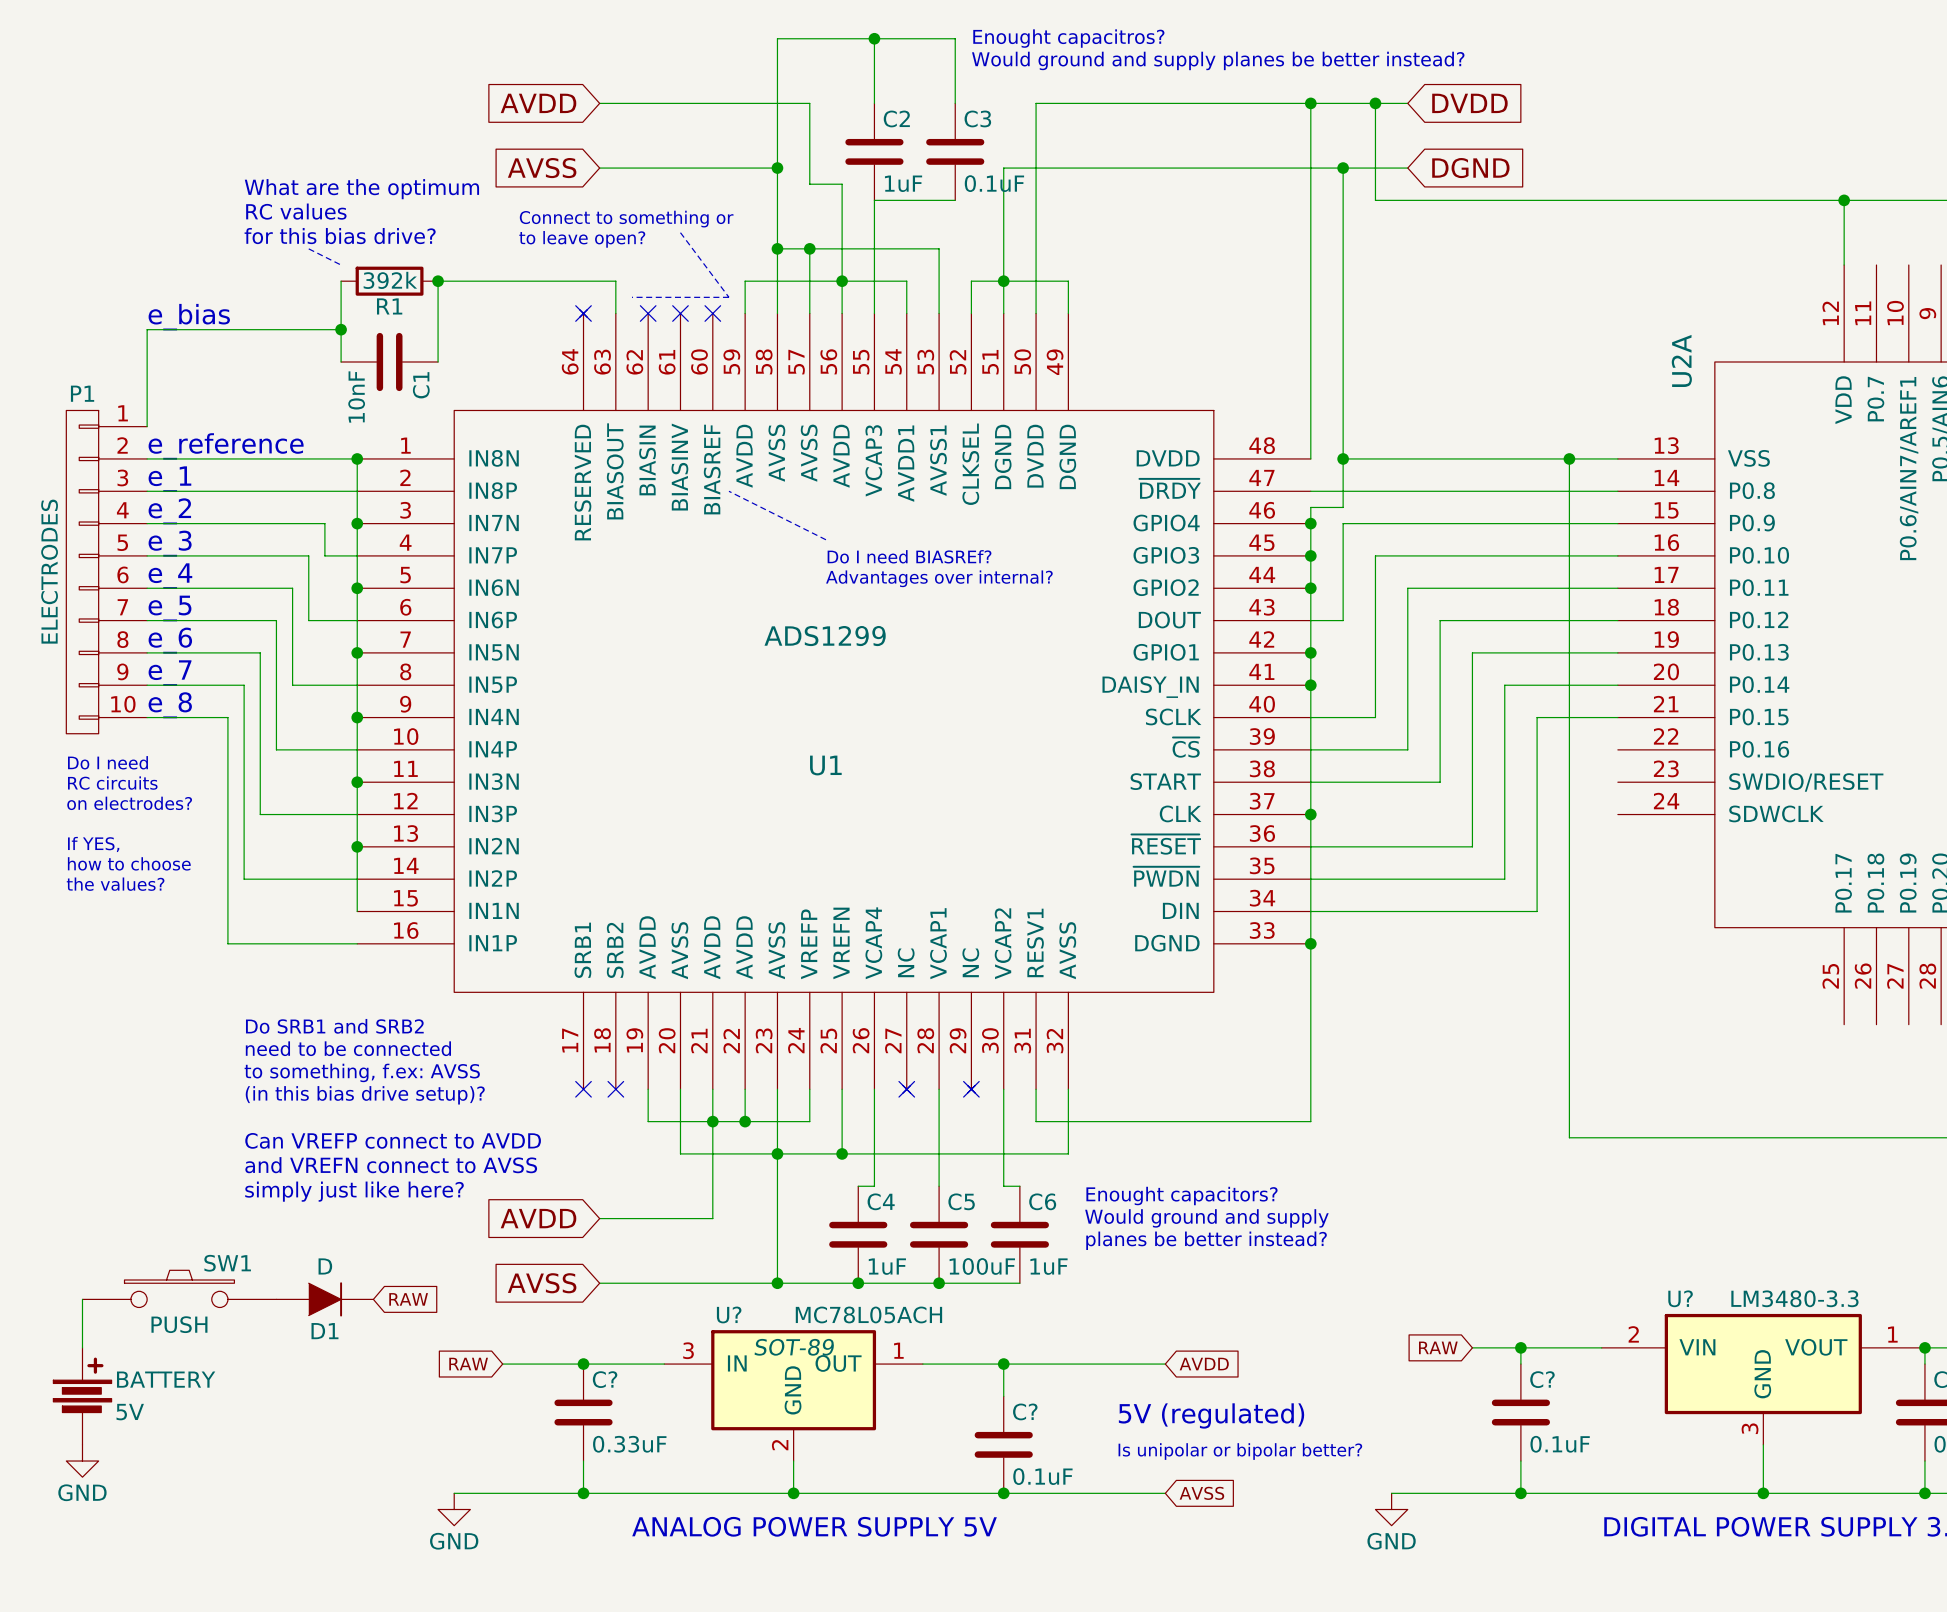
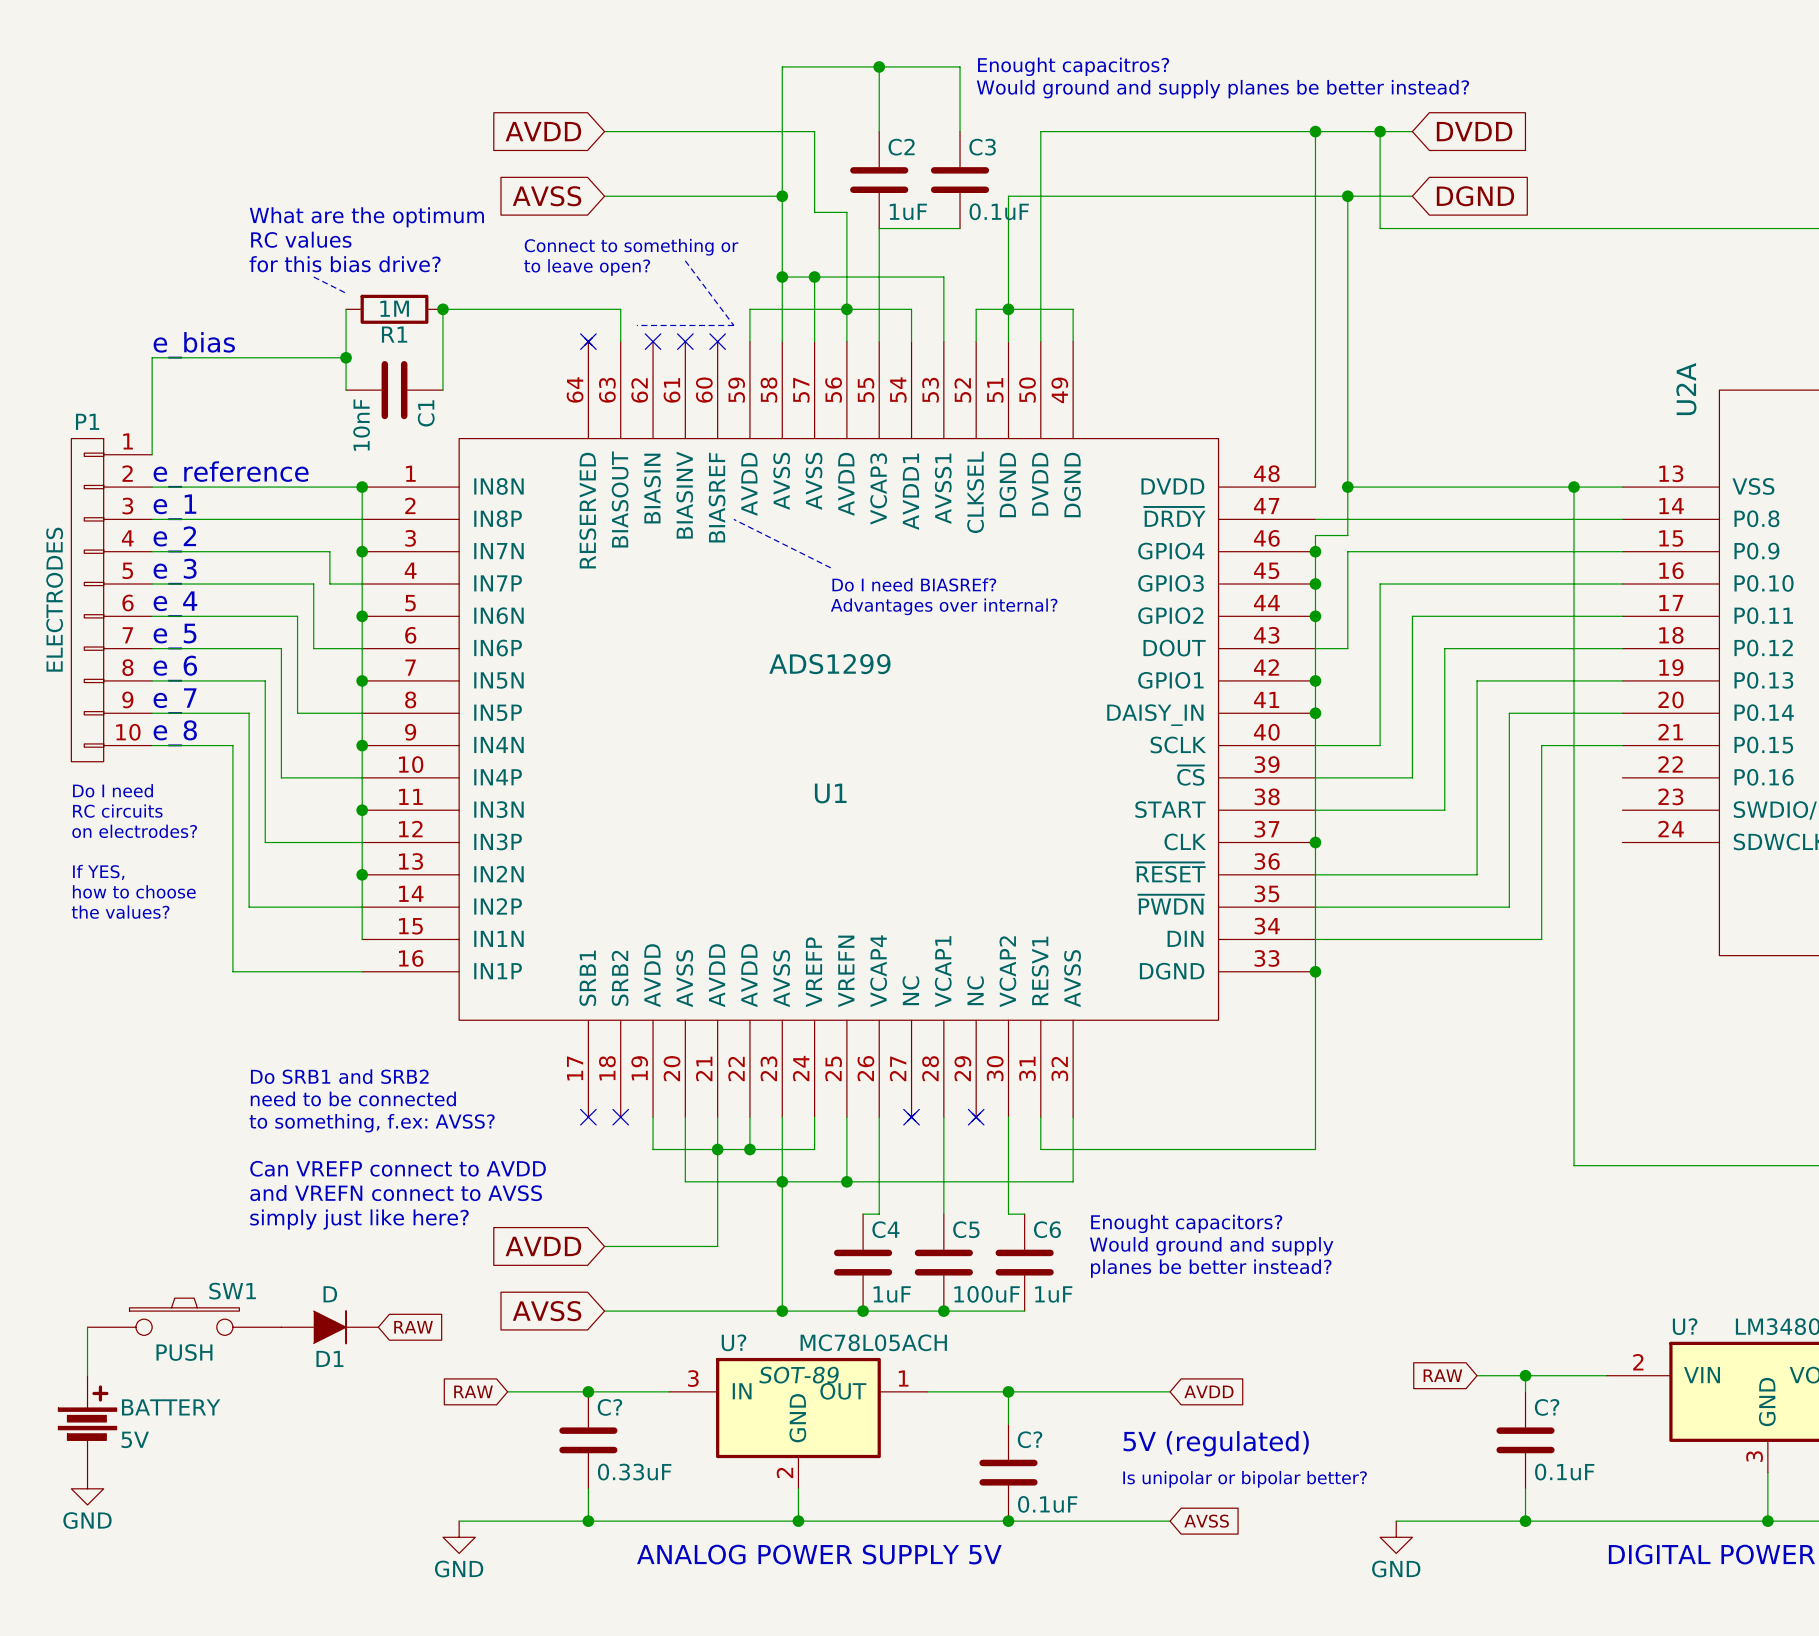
R1 value: 392k (390, 280) -> 1M (394, 308)
text: Do SRB1 and SRB2 (334, 1026) -> none
text: need to be connected (348, 1048) -> Do SRB1 and SRB2 (339, 1076)
text: to something, f.ex: AVSS (362, 1072) -> need to be connected (353, 1098)
text: (in this bias drive setup)? (365, 1095) -> to something, f.ex: AVSS? (372, 1123)

